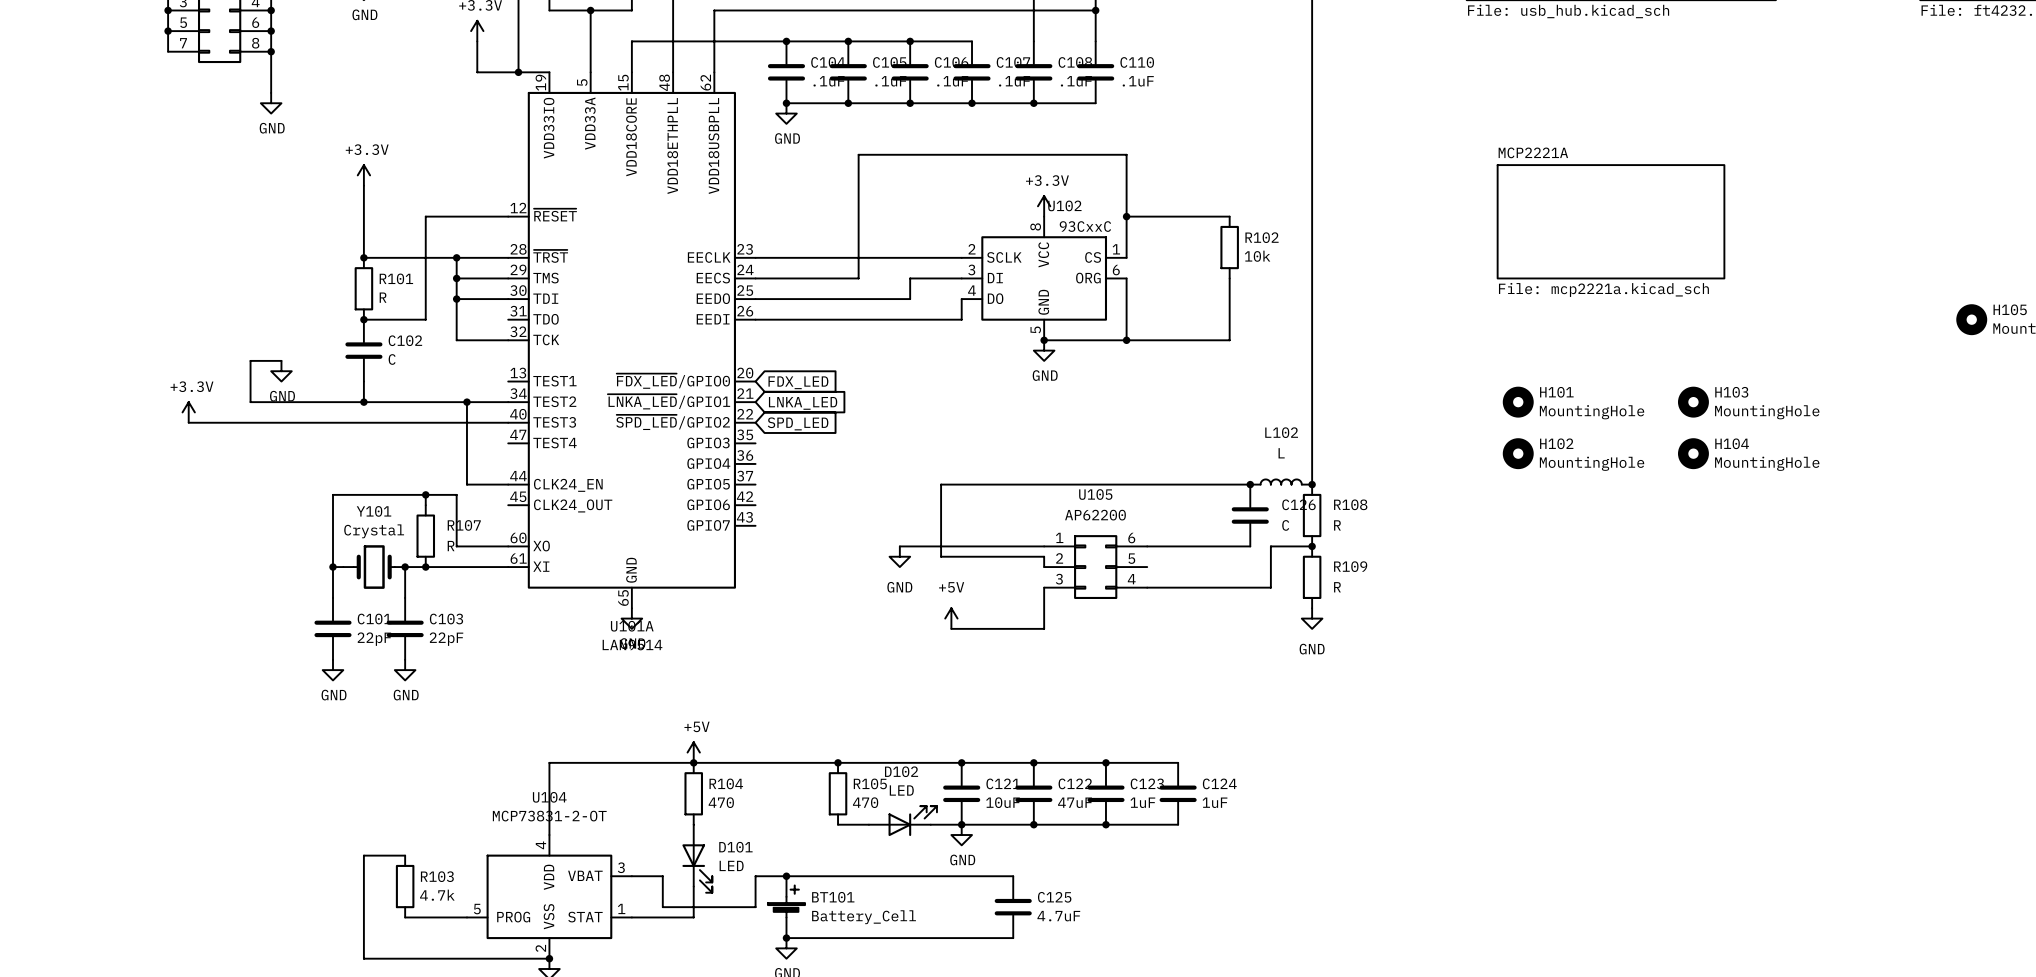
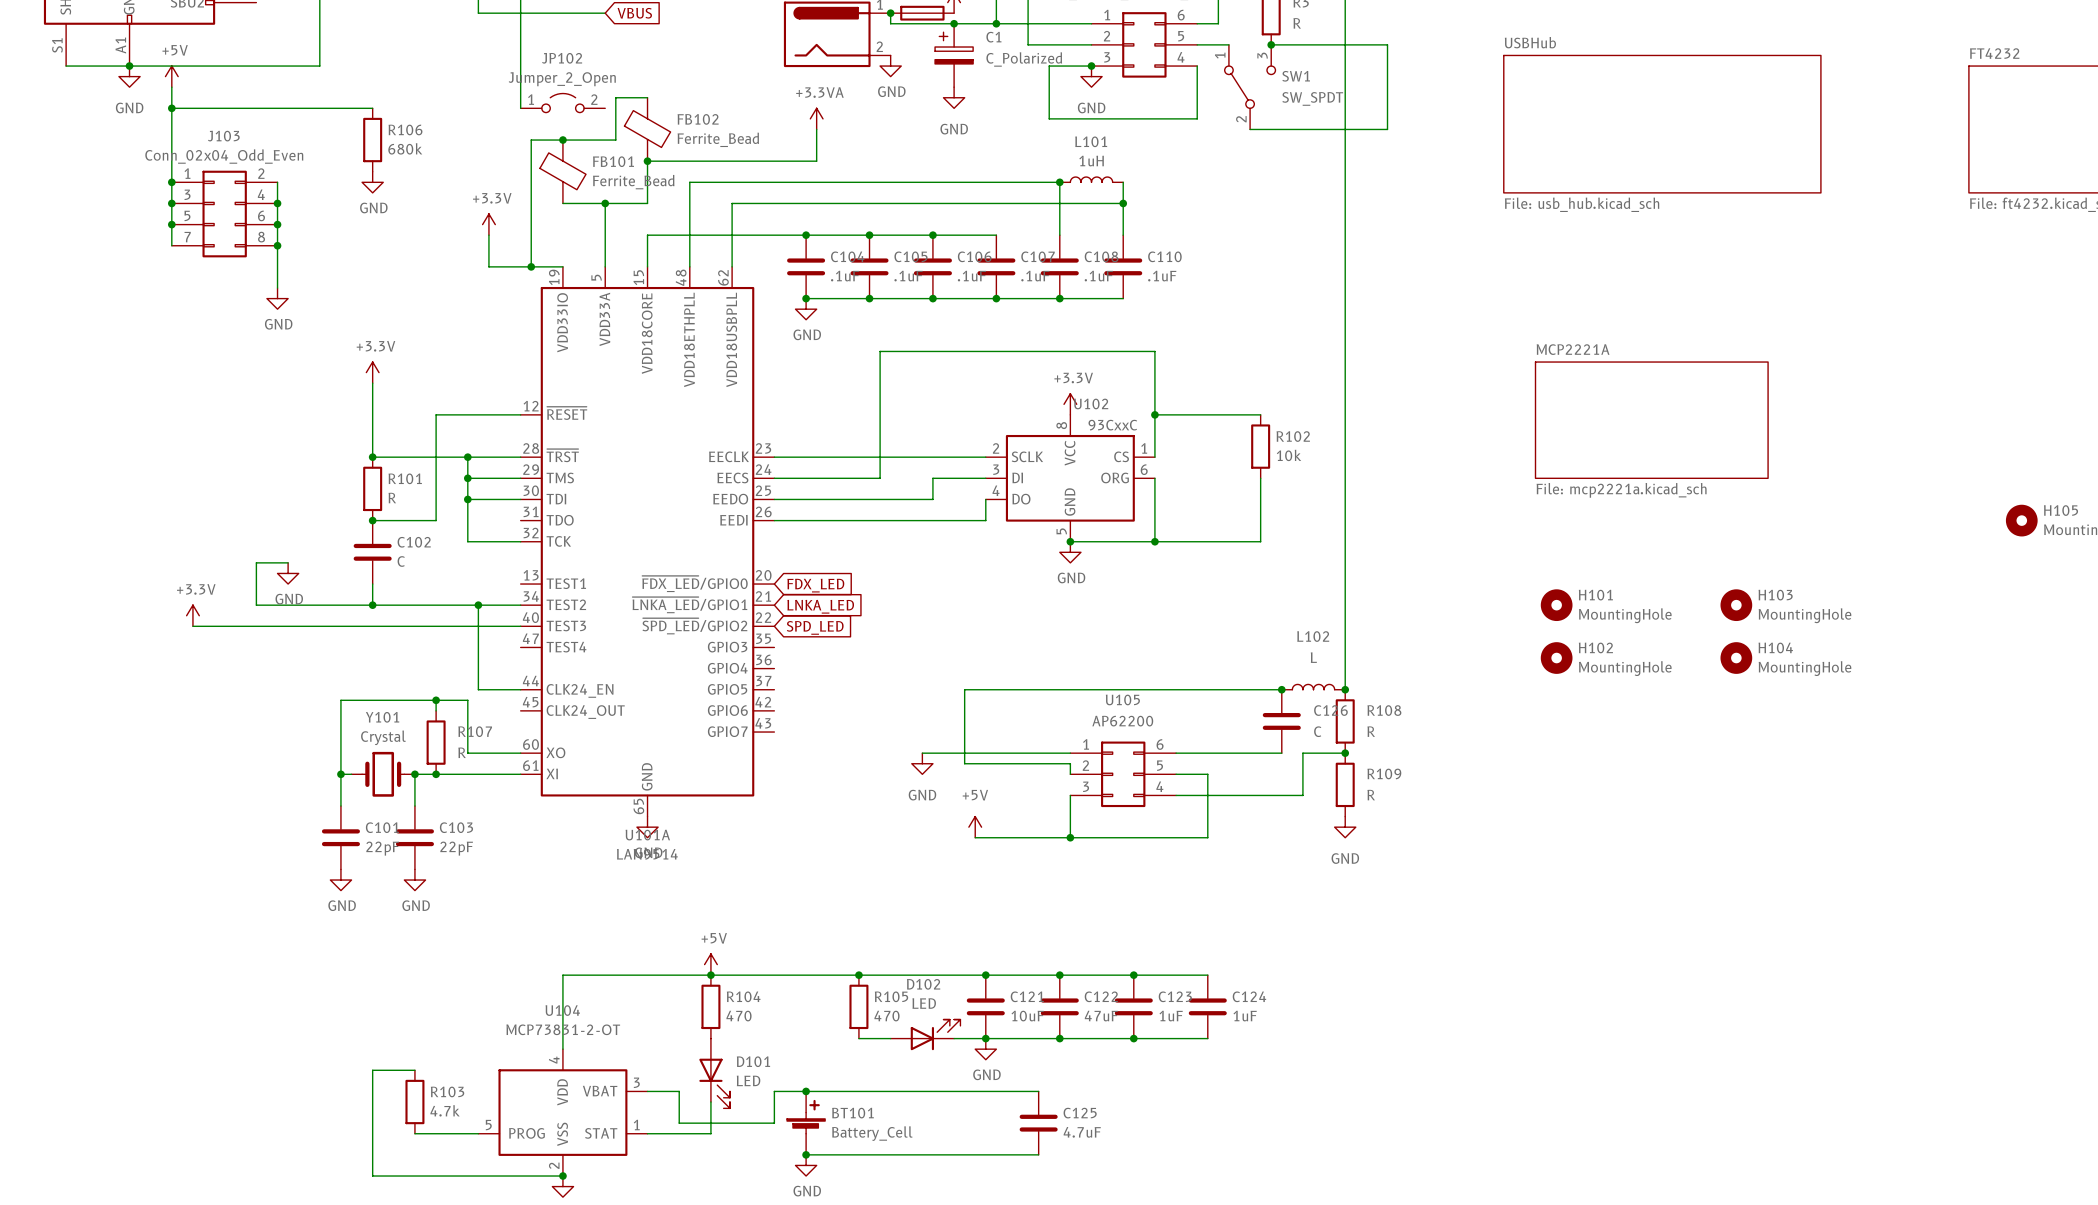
wire: none -> (1176, 774) (1207, 774) (1207, 837) (1070, 837)
junction: none -> (1070, 837)

